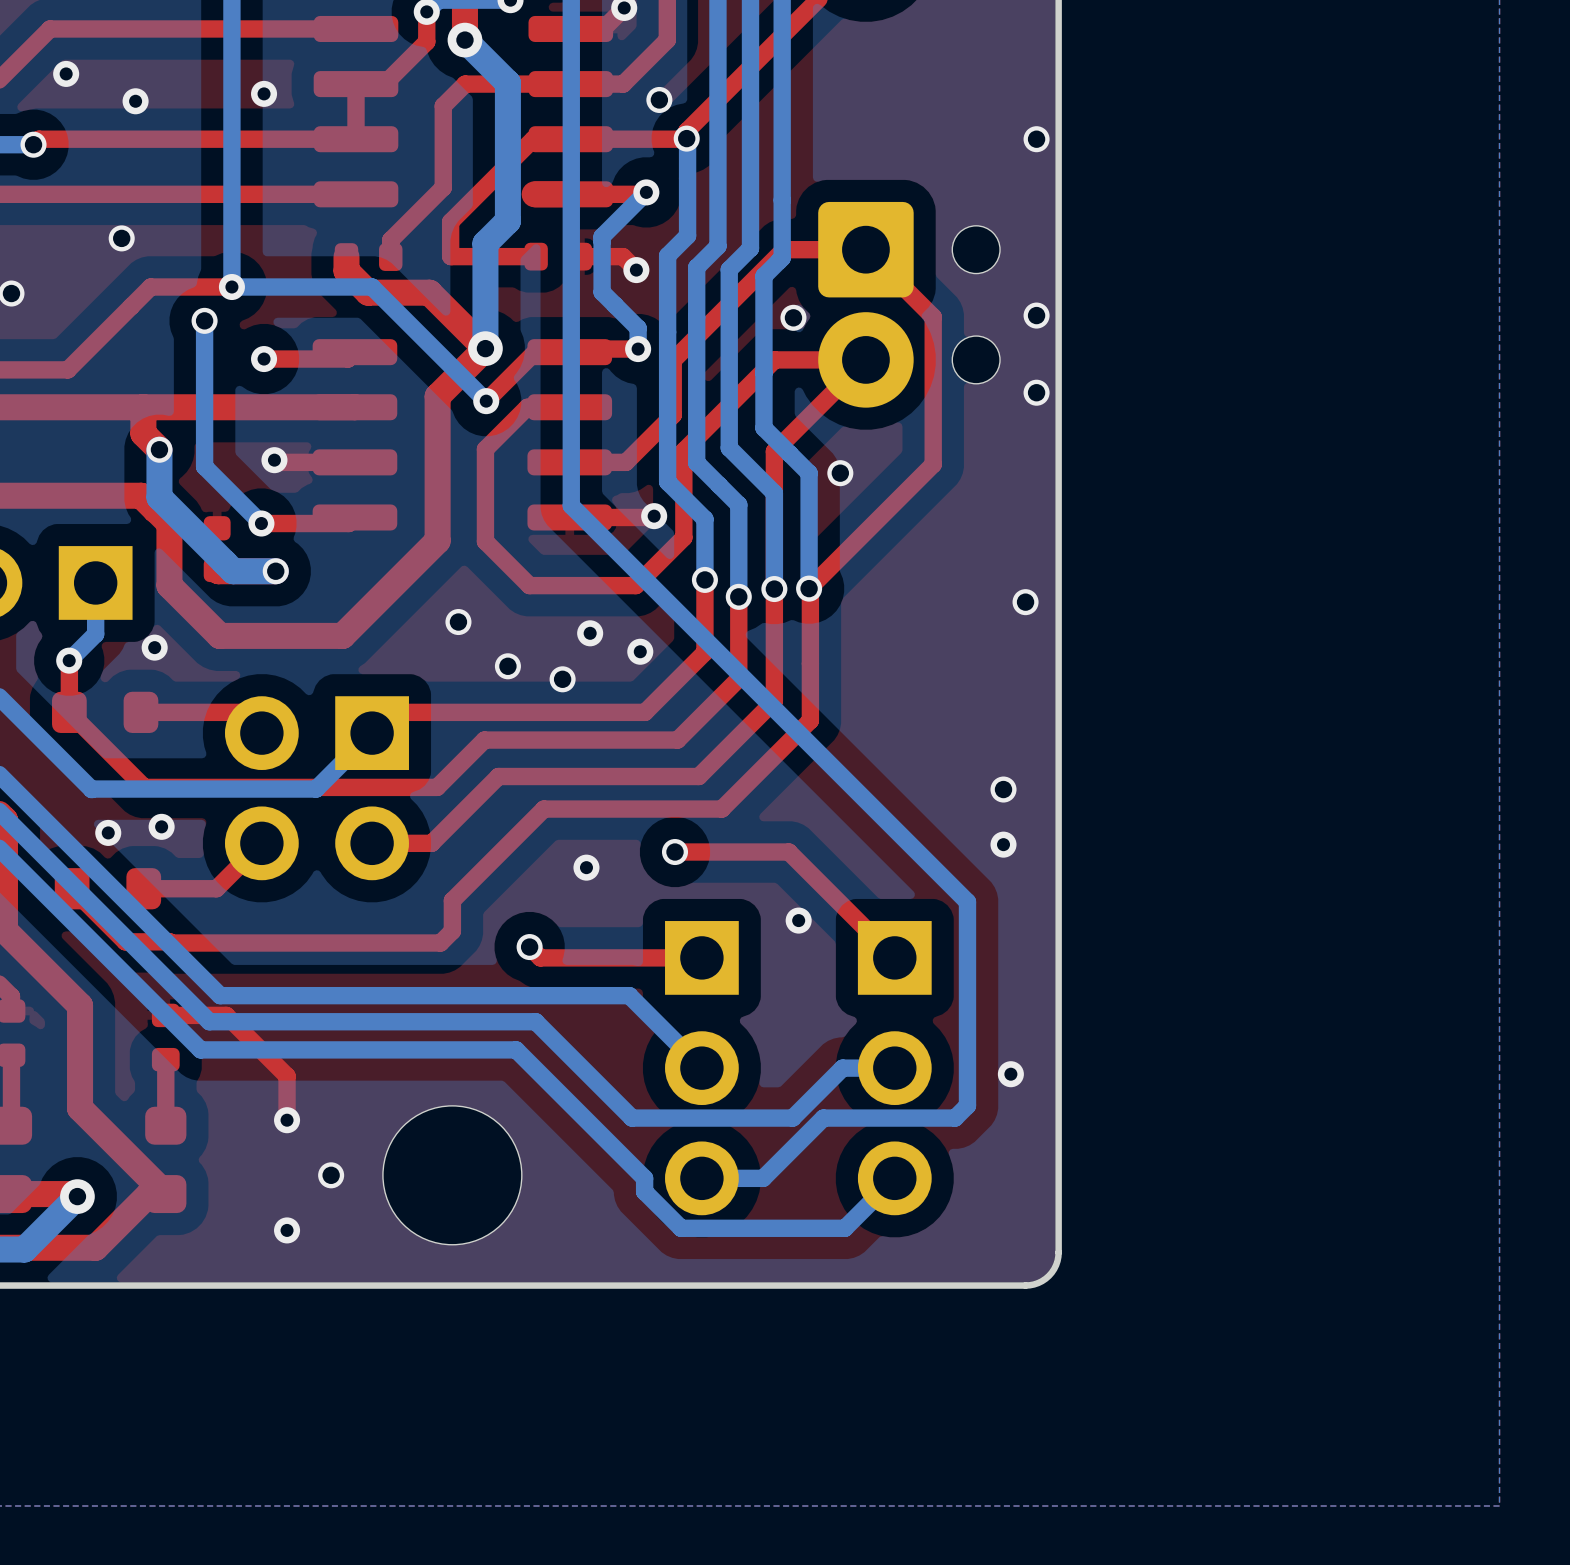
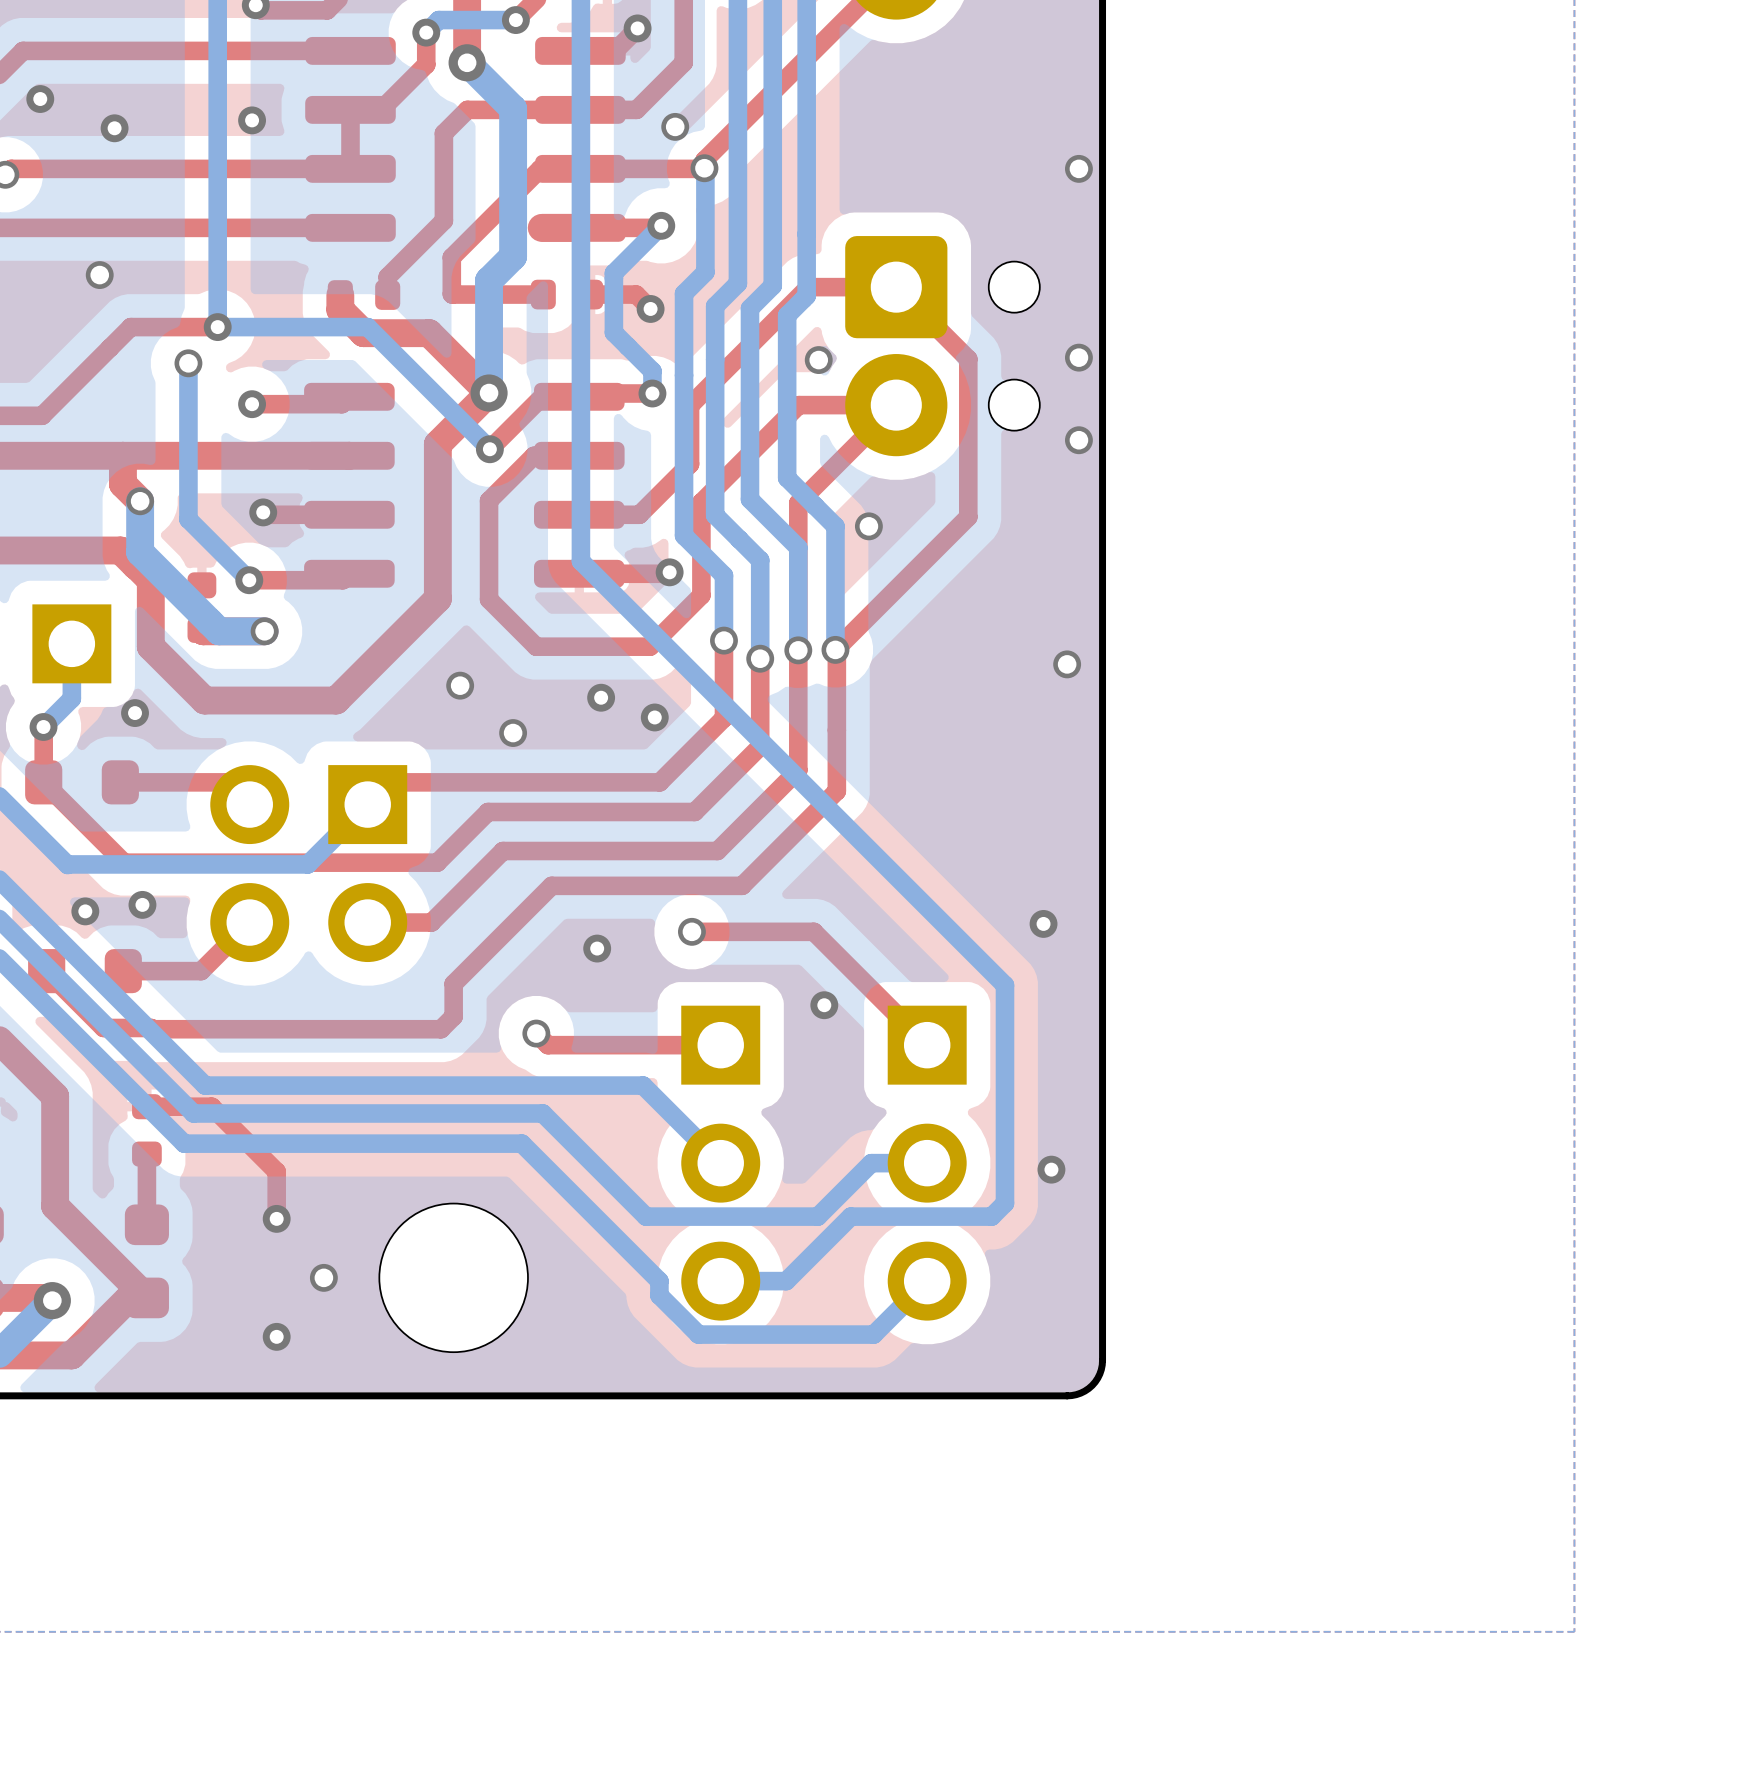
via: (562, 679) -> none
via: (1003, 789) -> none

